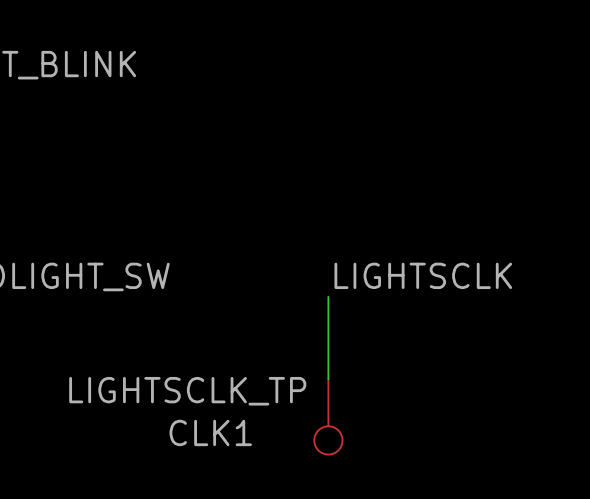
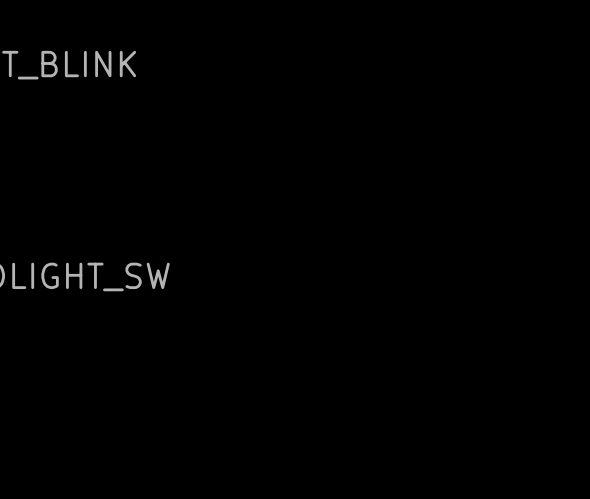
label: LIGHTSCLK (423, 275) -> none
wire: (328, 296) (328, 379) -> none
CLK1: LIGHTSCLK_TP (328, 416) -> none

